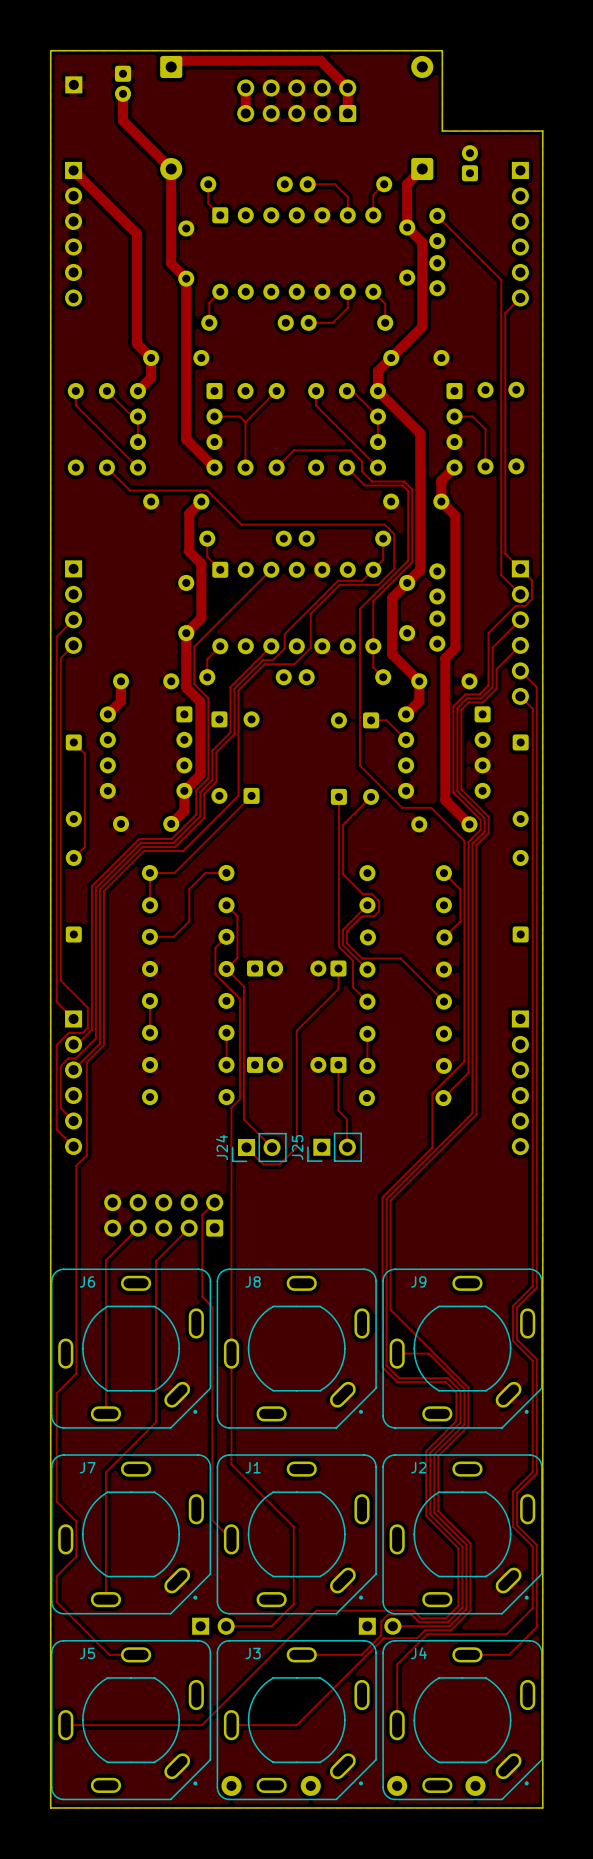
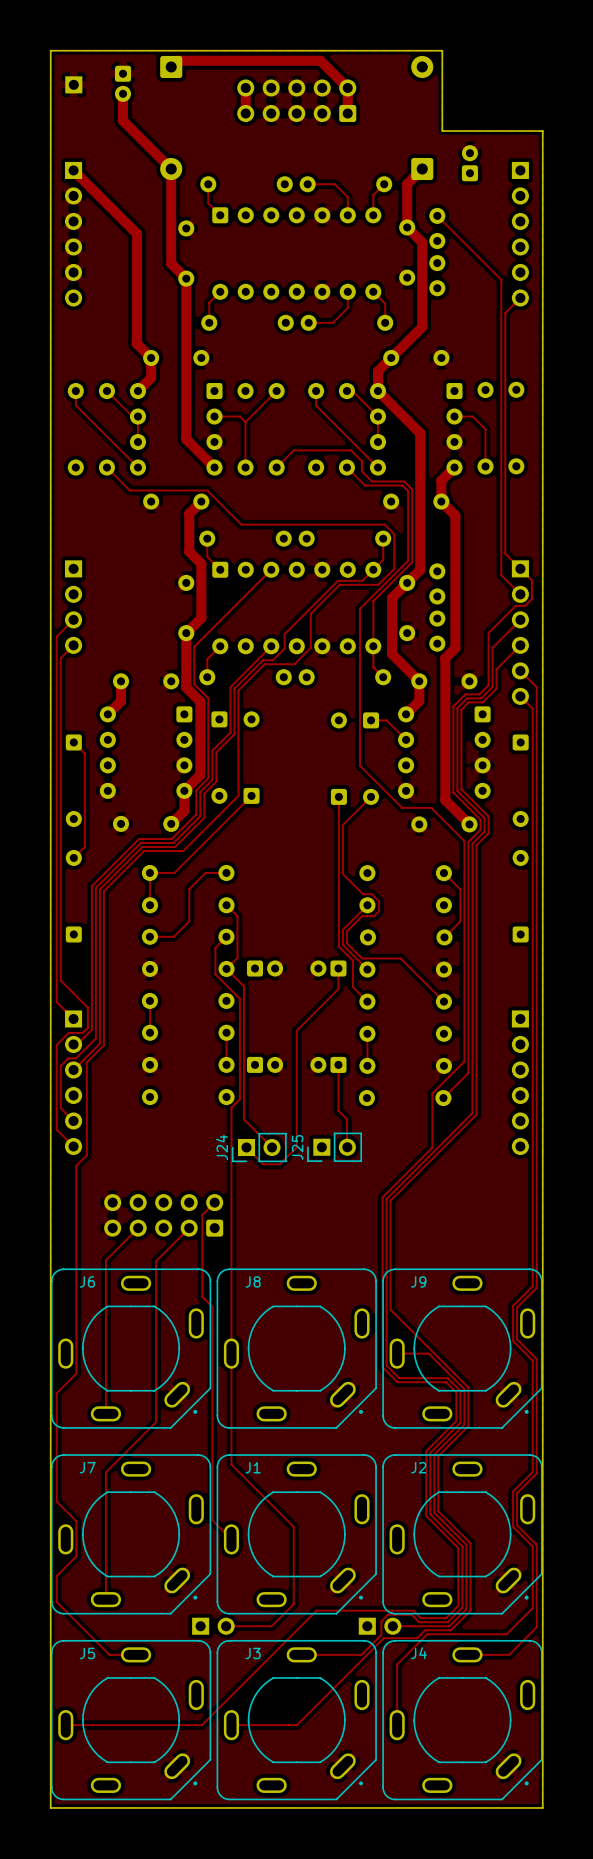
part: (231, 1785) -> none
part: (310, 1785) -> none
part: (397, 1785) -> none
part: (475, 1785) -> none

